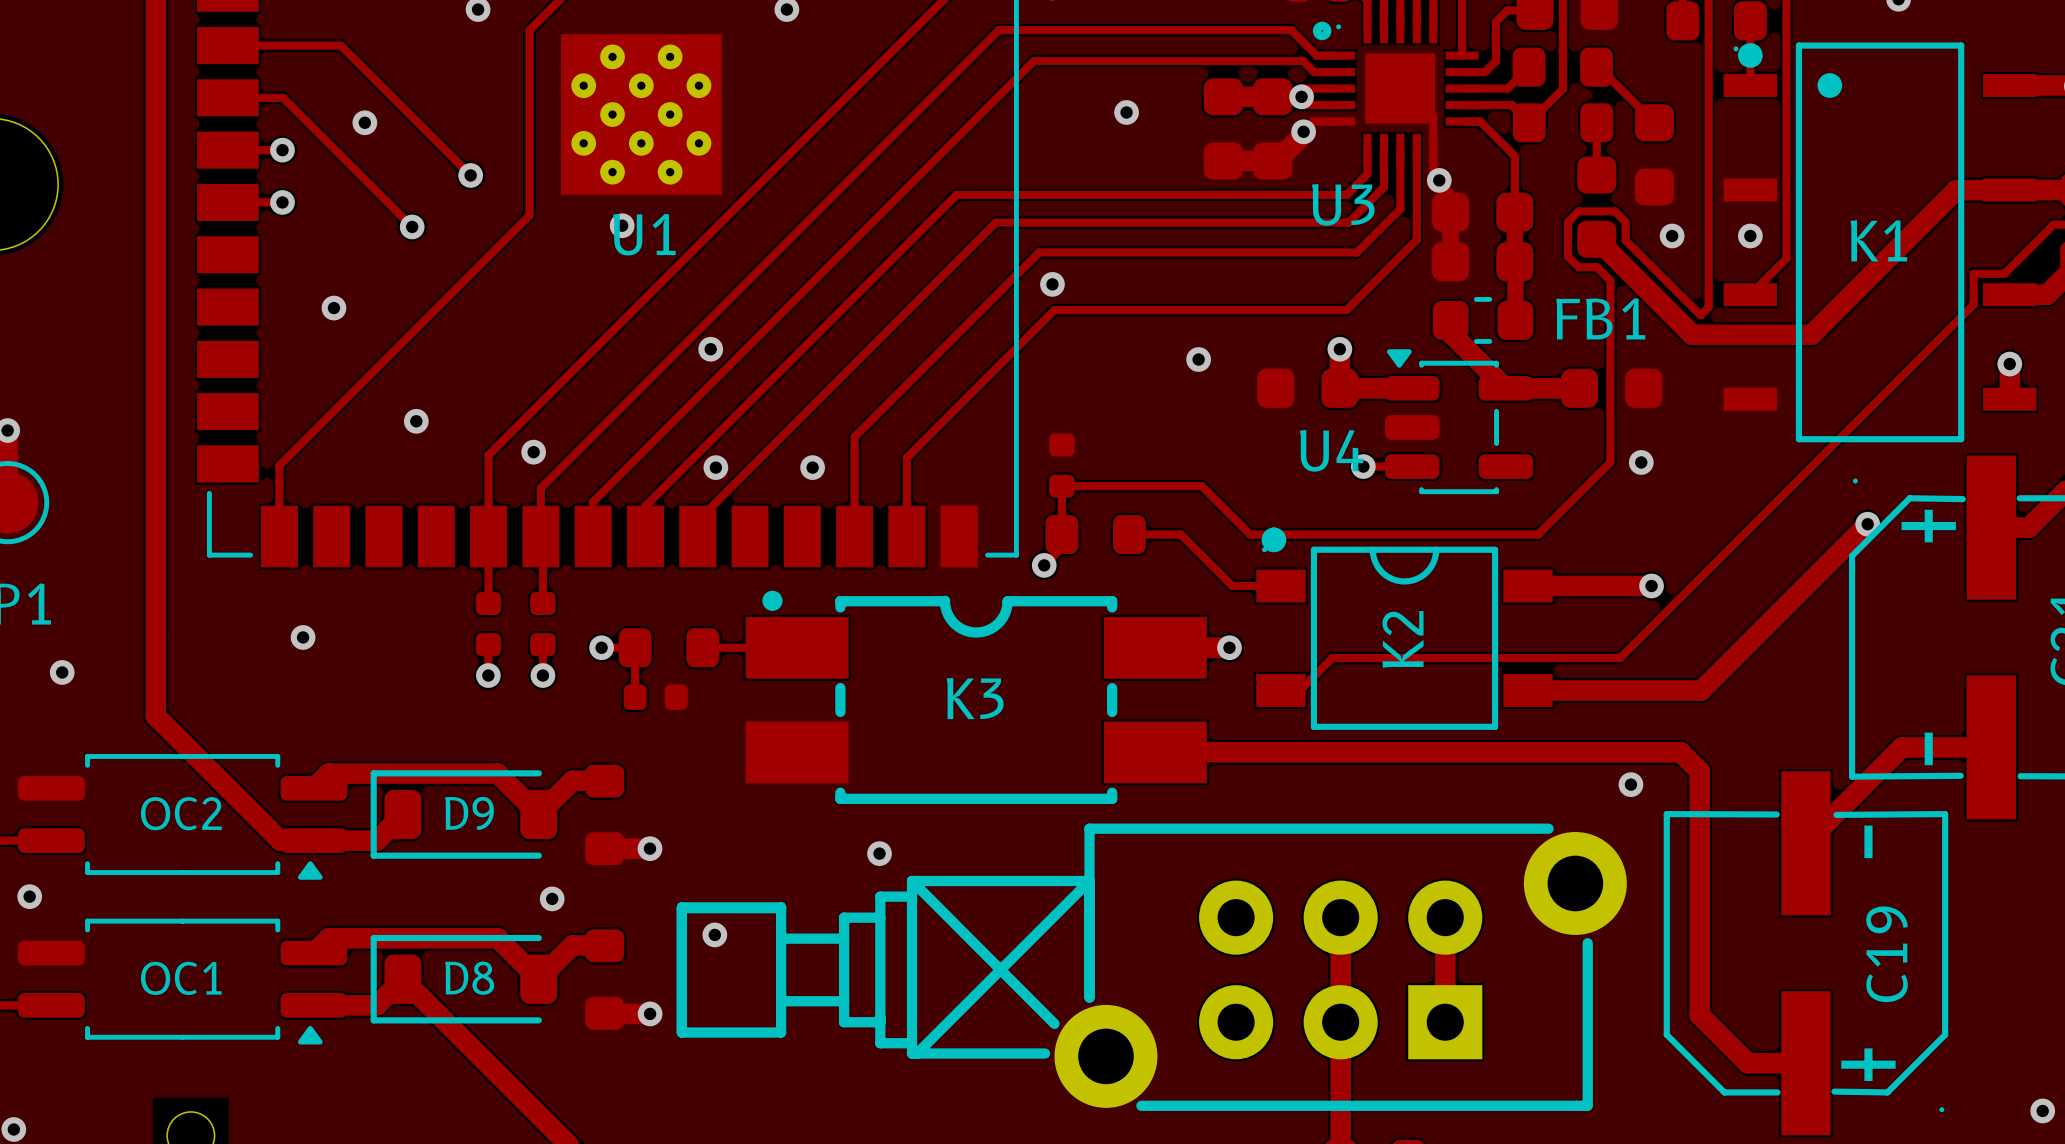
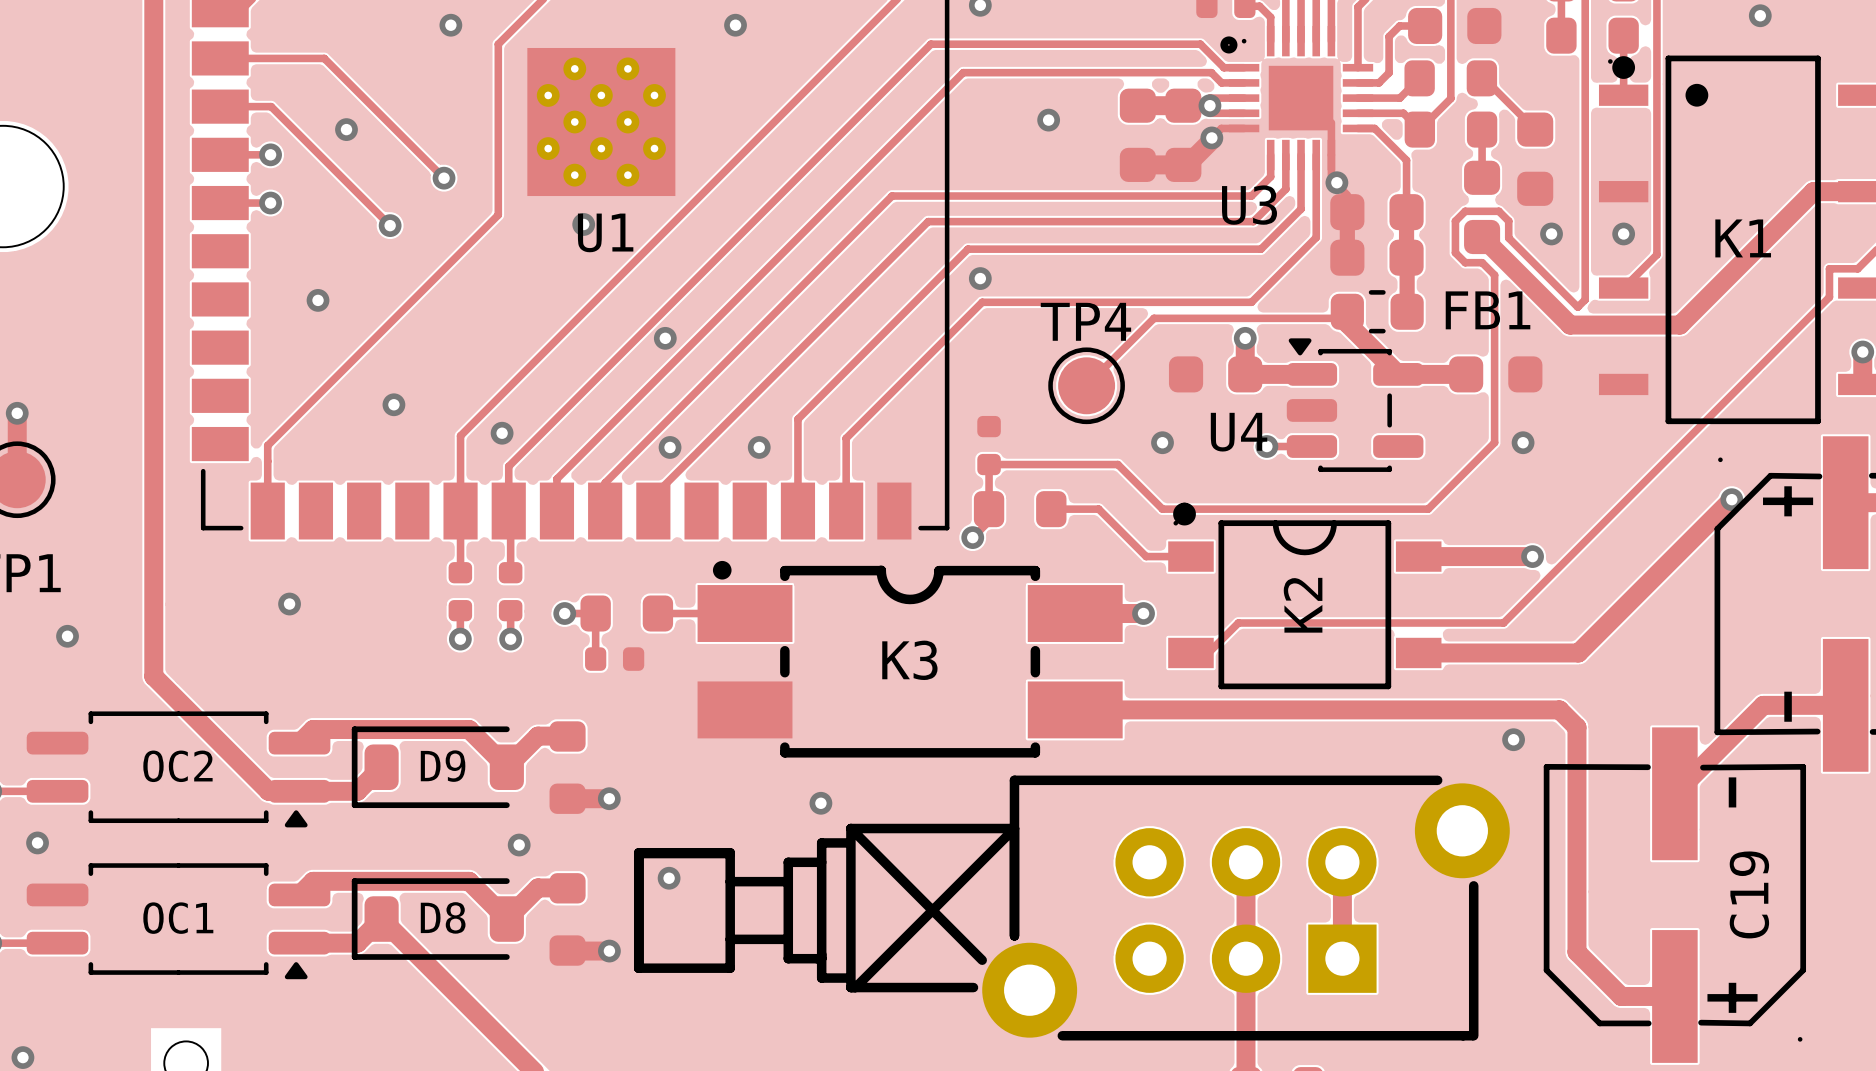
track: none -> (1347, 311) (1340, 318) (1154, 318) (1086, 385)
via position: (1198, 359) -> (1162, 442)
TP4: none -> (1086, 385)

